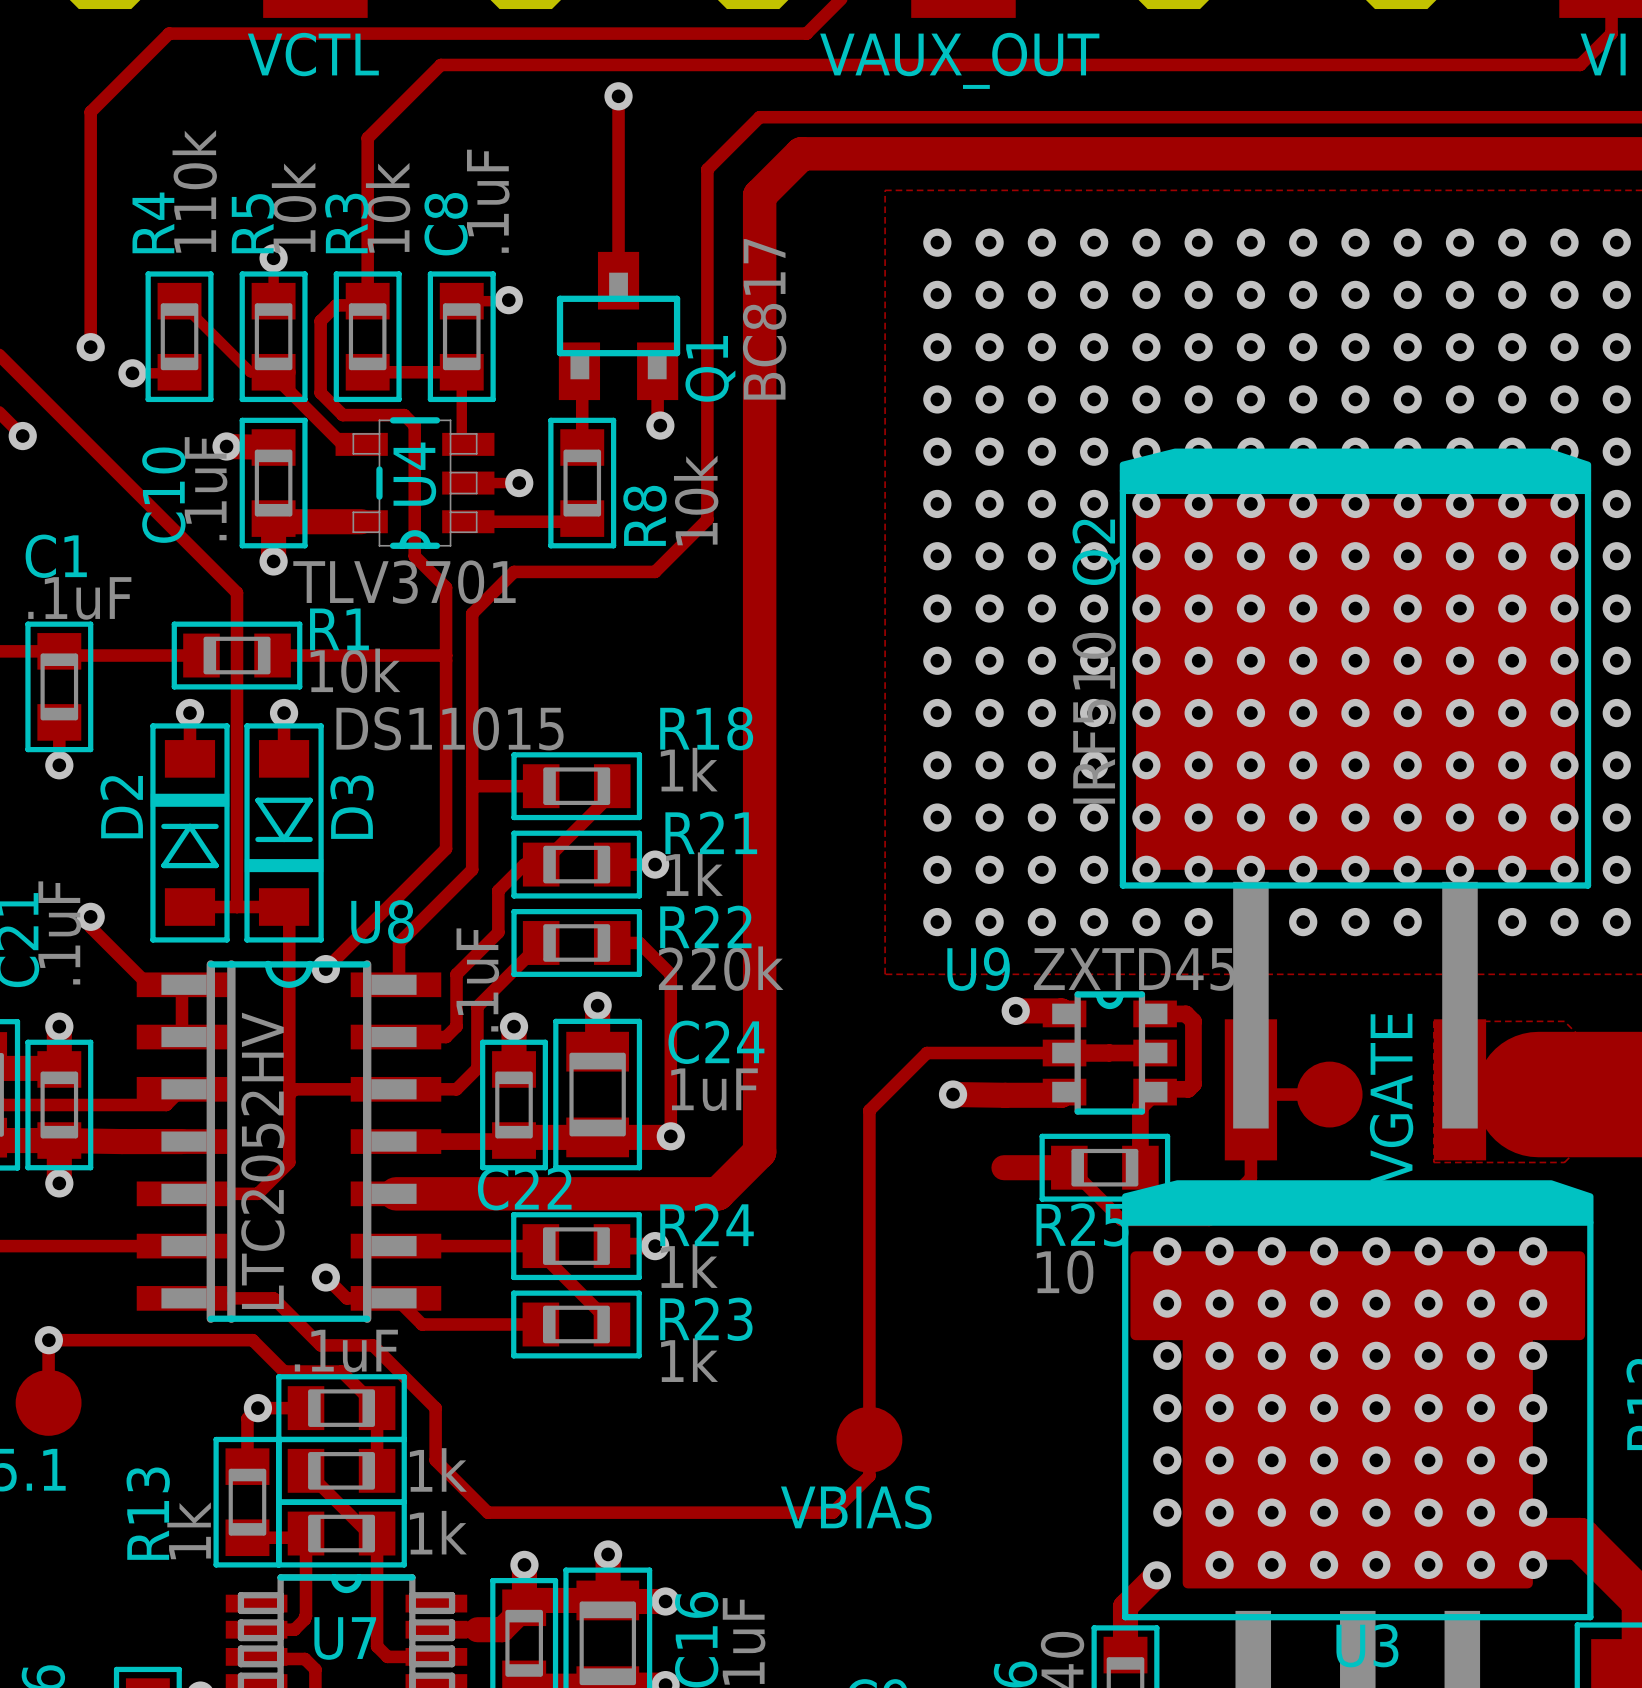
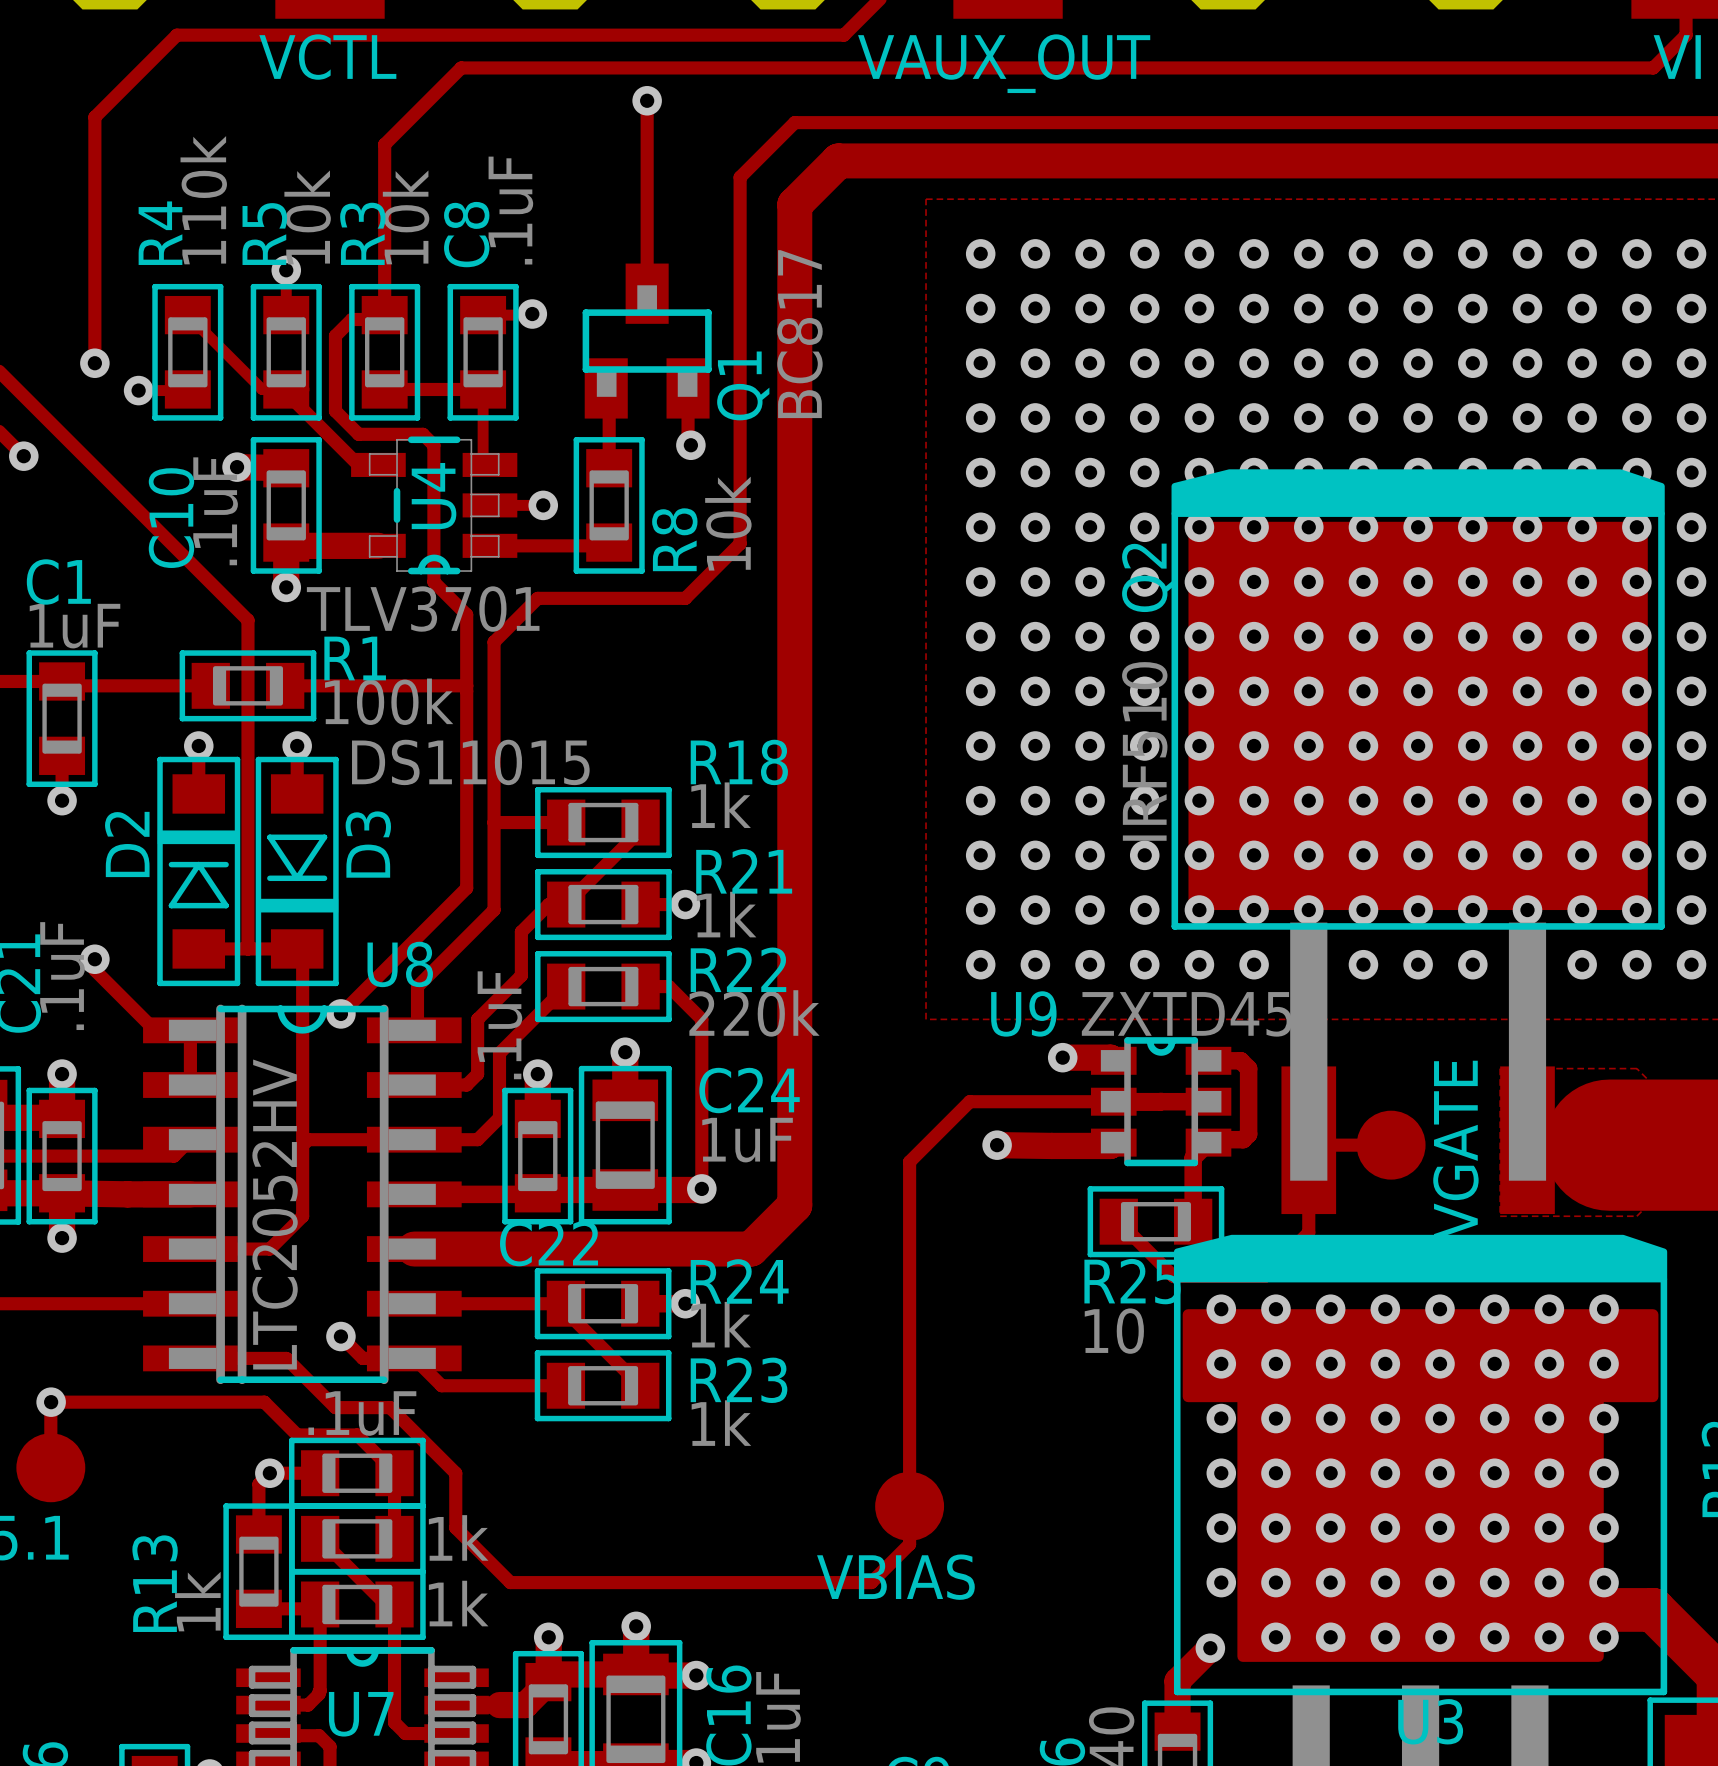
C1 value: .1uF (79, 598) -> 1uF (75, 626)
R1 value: 10k (355, 670) -> 100k (389, 701)
track: (1003, 1167) (1069, 1167) -> none

